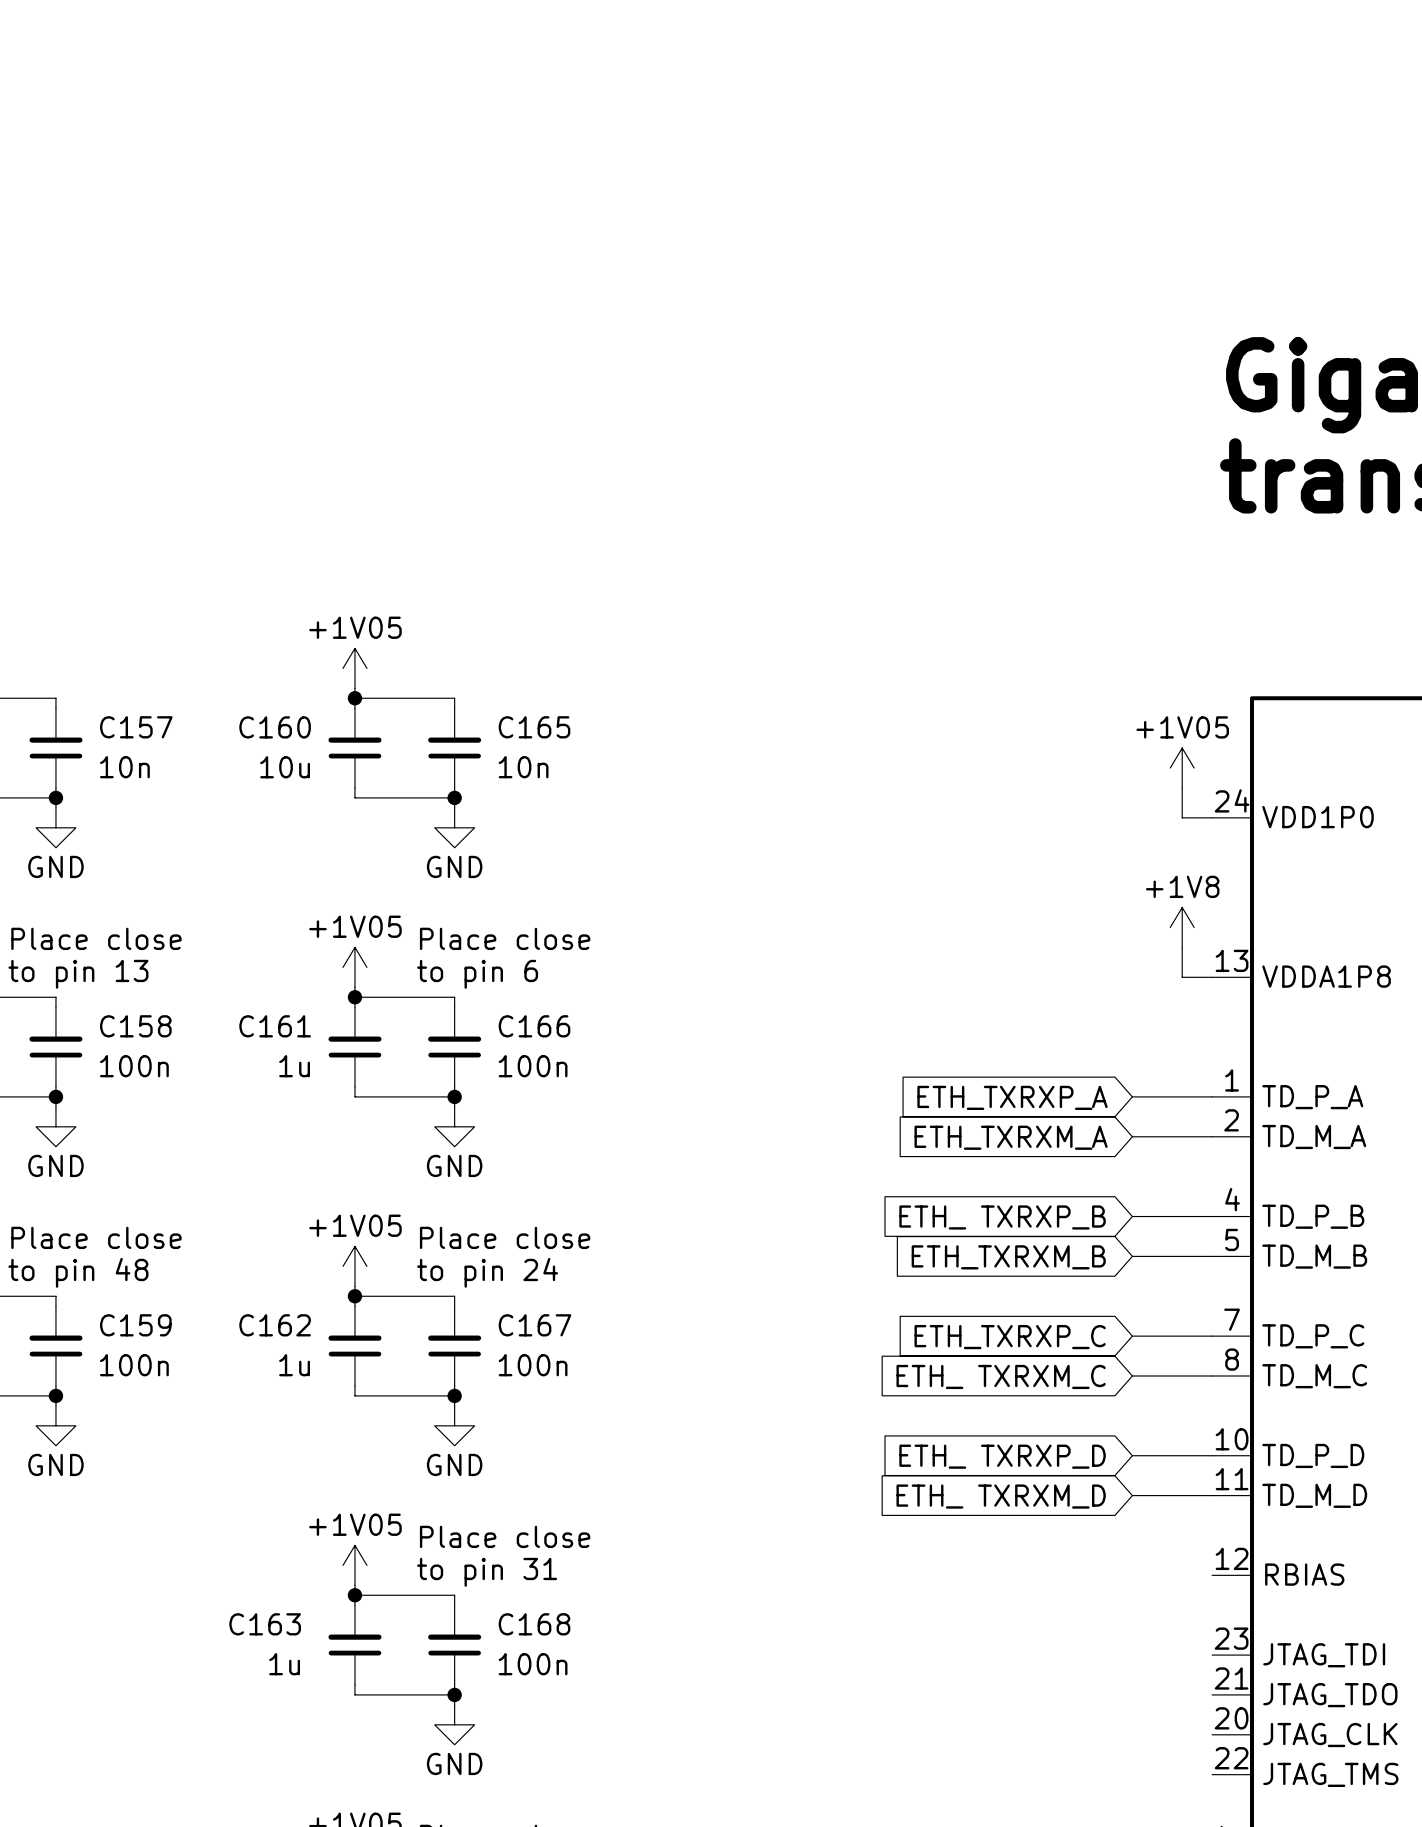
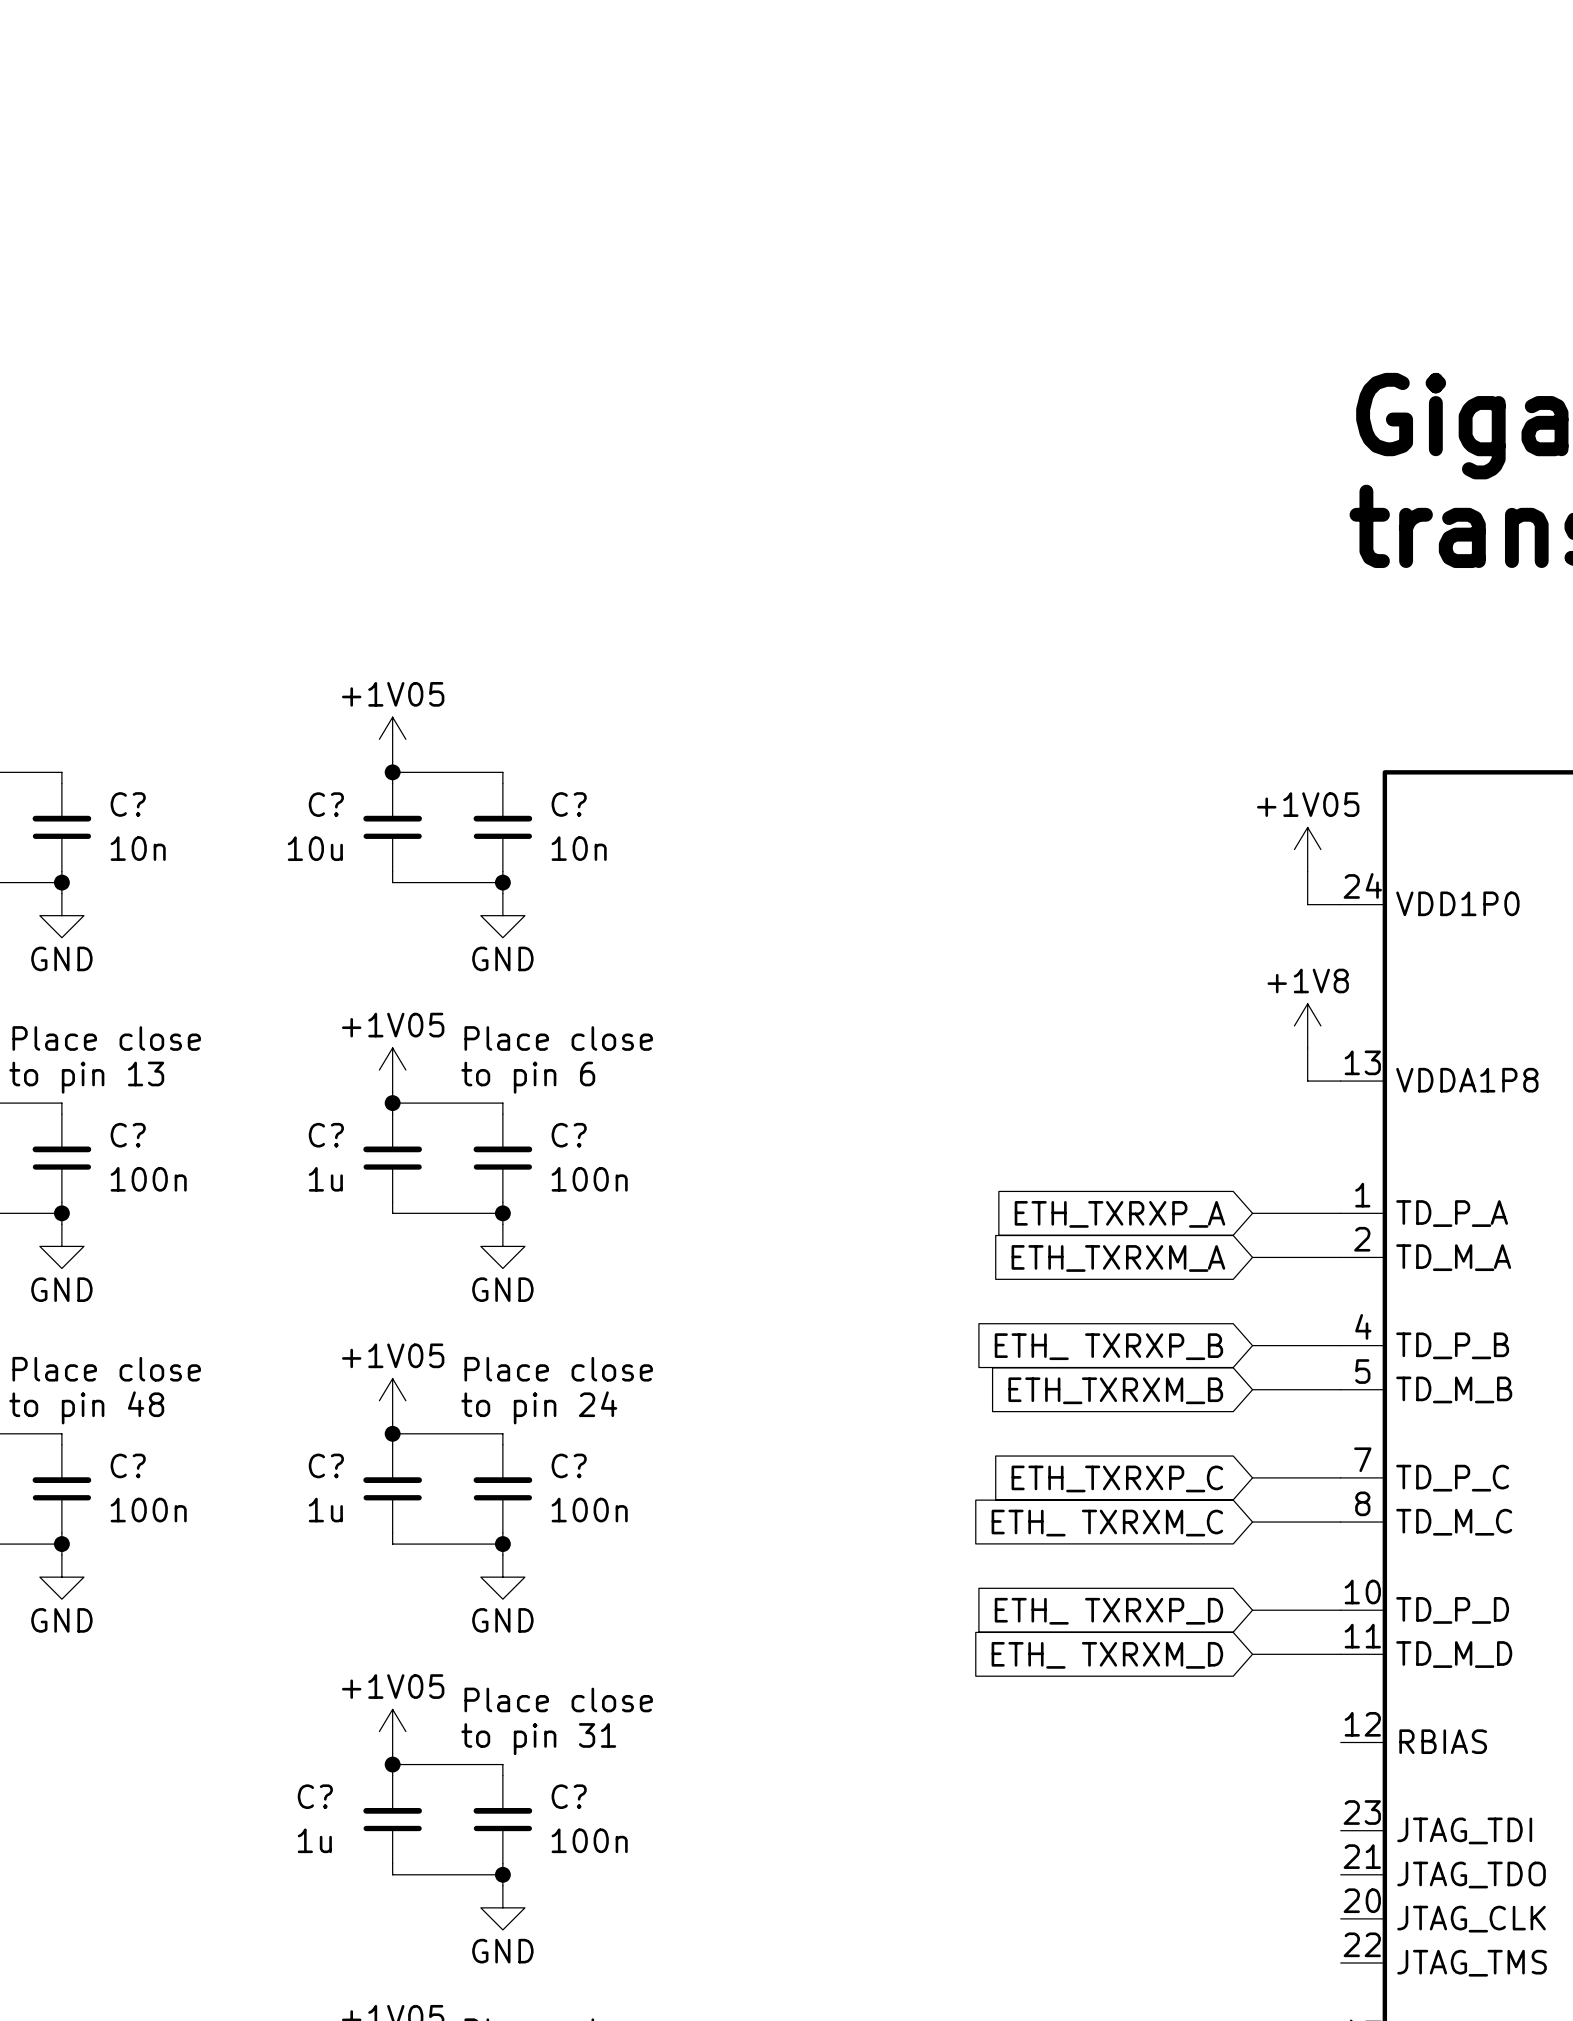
C157 name: C157 (136, 727) -> C? (128, 804)
C160 name: C160 (275, 727) -> C? (326, 804)
C165 name: C165 (534, 727) -> C? (569, 804)
C158 name: C158 (135, 1026) -> C? (128, 1135)
C161 name: C161 (275, 1026) -> C? (326, 1135)
C166 name: C166 (534, 1026) -> C? (569, 1135)
C159 name: C159 (135, 1325) -> C? (128, 1465)
C162 name: C162 (275, 1325) -> C? (326, 1465)
C167 name: C167 (534, 1325) -> C? (569, 1465)
C163 name: C163 (265, 1624) -> C? (315, 1796)
C168 name: C168 (534, 1624) -> C? (569, 1796)

